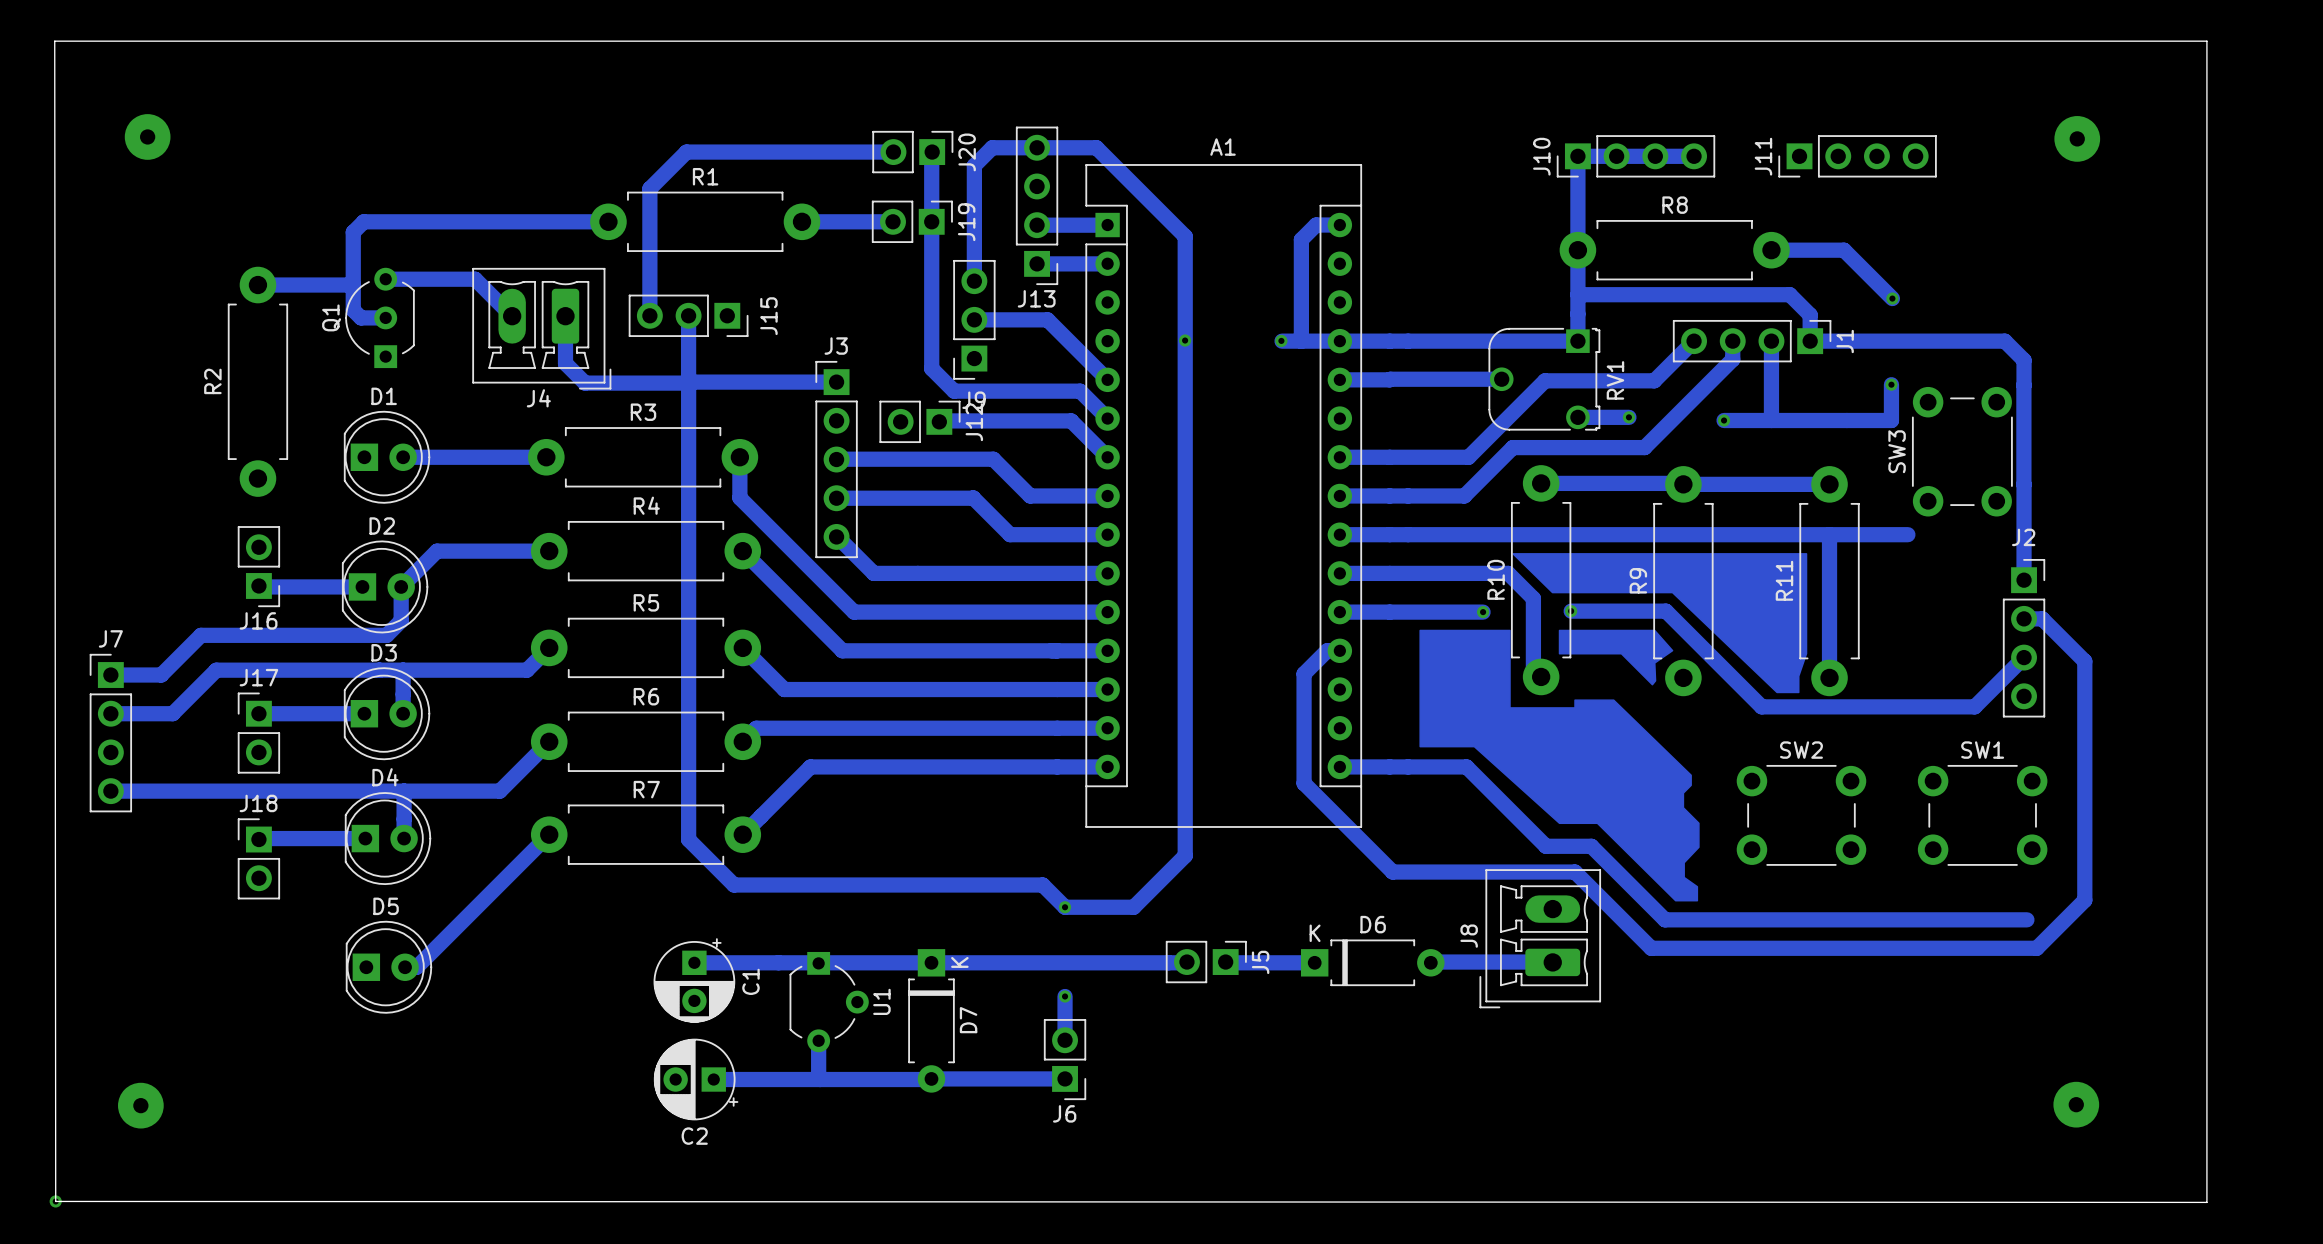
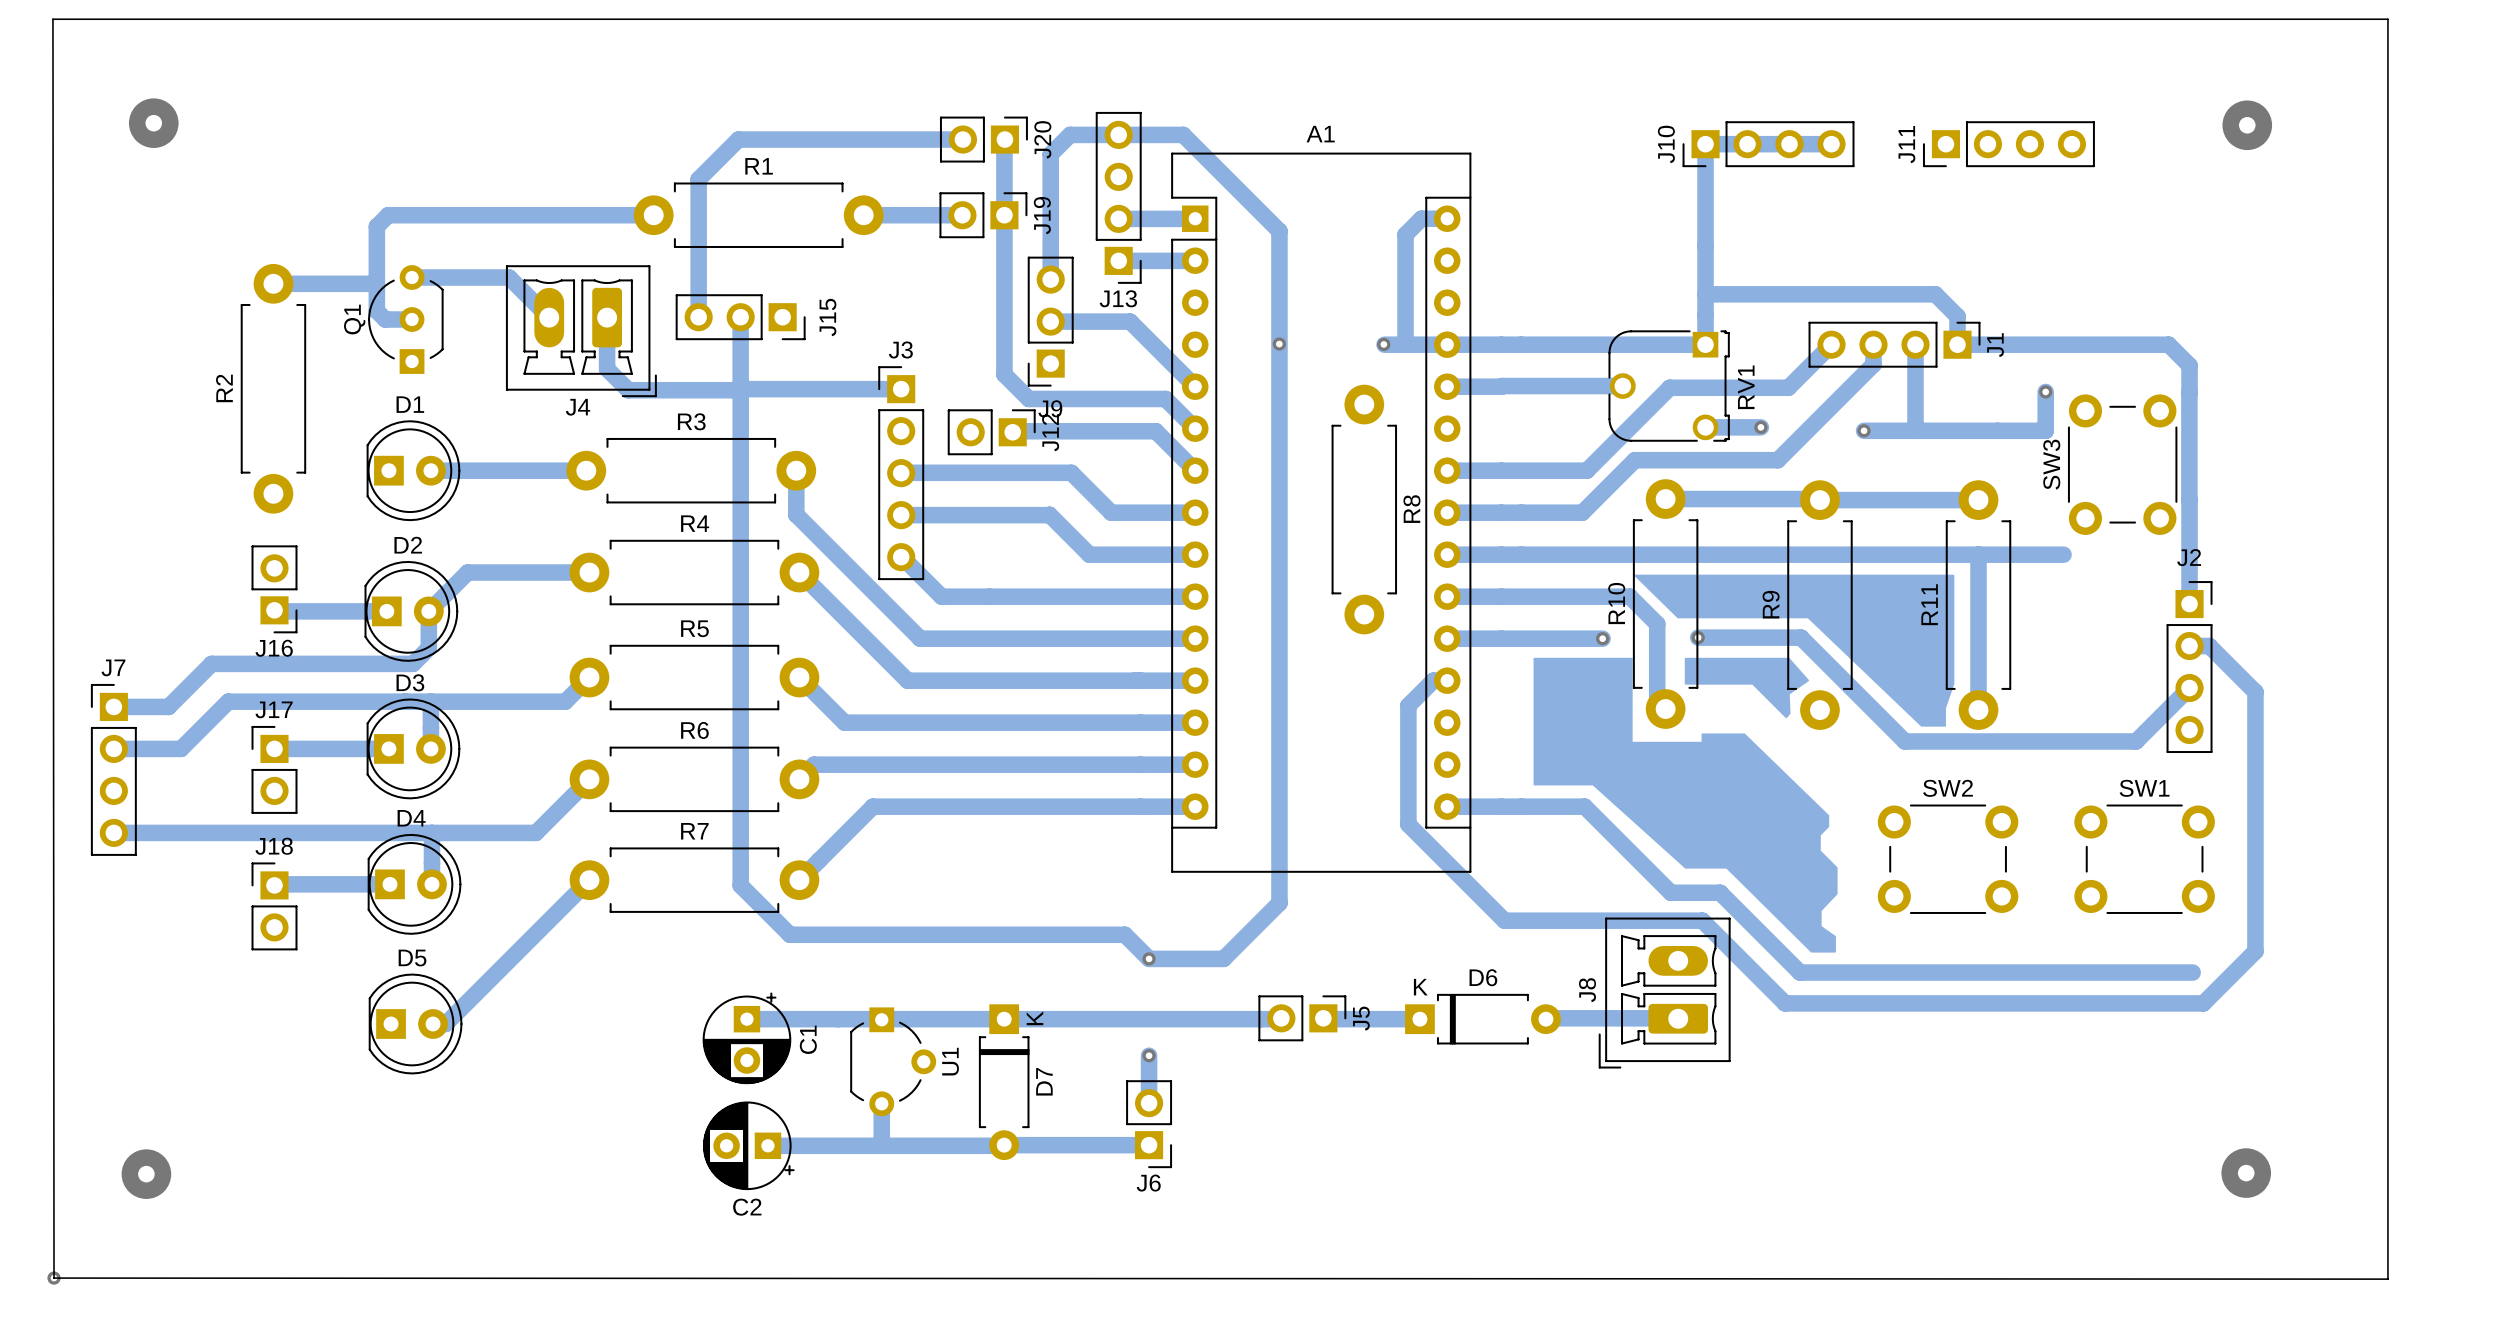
R8 rotation: 0° (1674, 250) -> 90° clockwise (1364, 509)
R8 position: (1674, 250) -> (1364, 509)
bottom track: (1771, 250) (1844, 250) (1892, 298) -> none
via: (1892, 298) -> none

